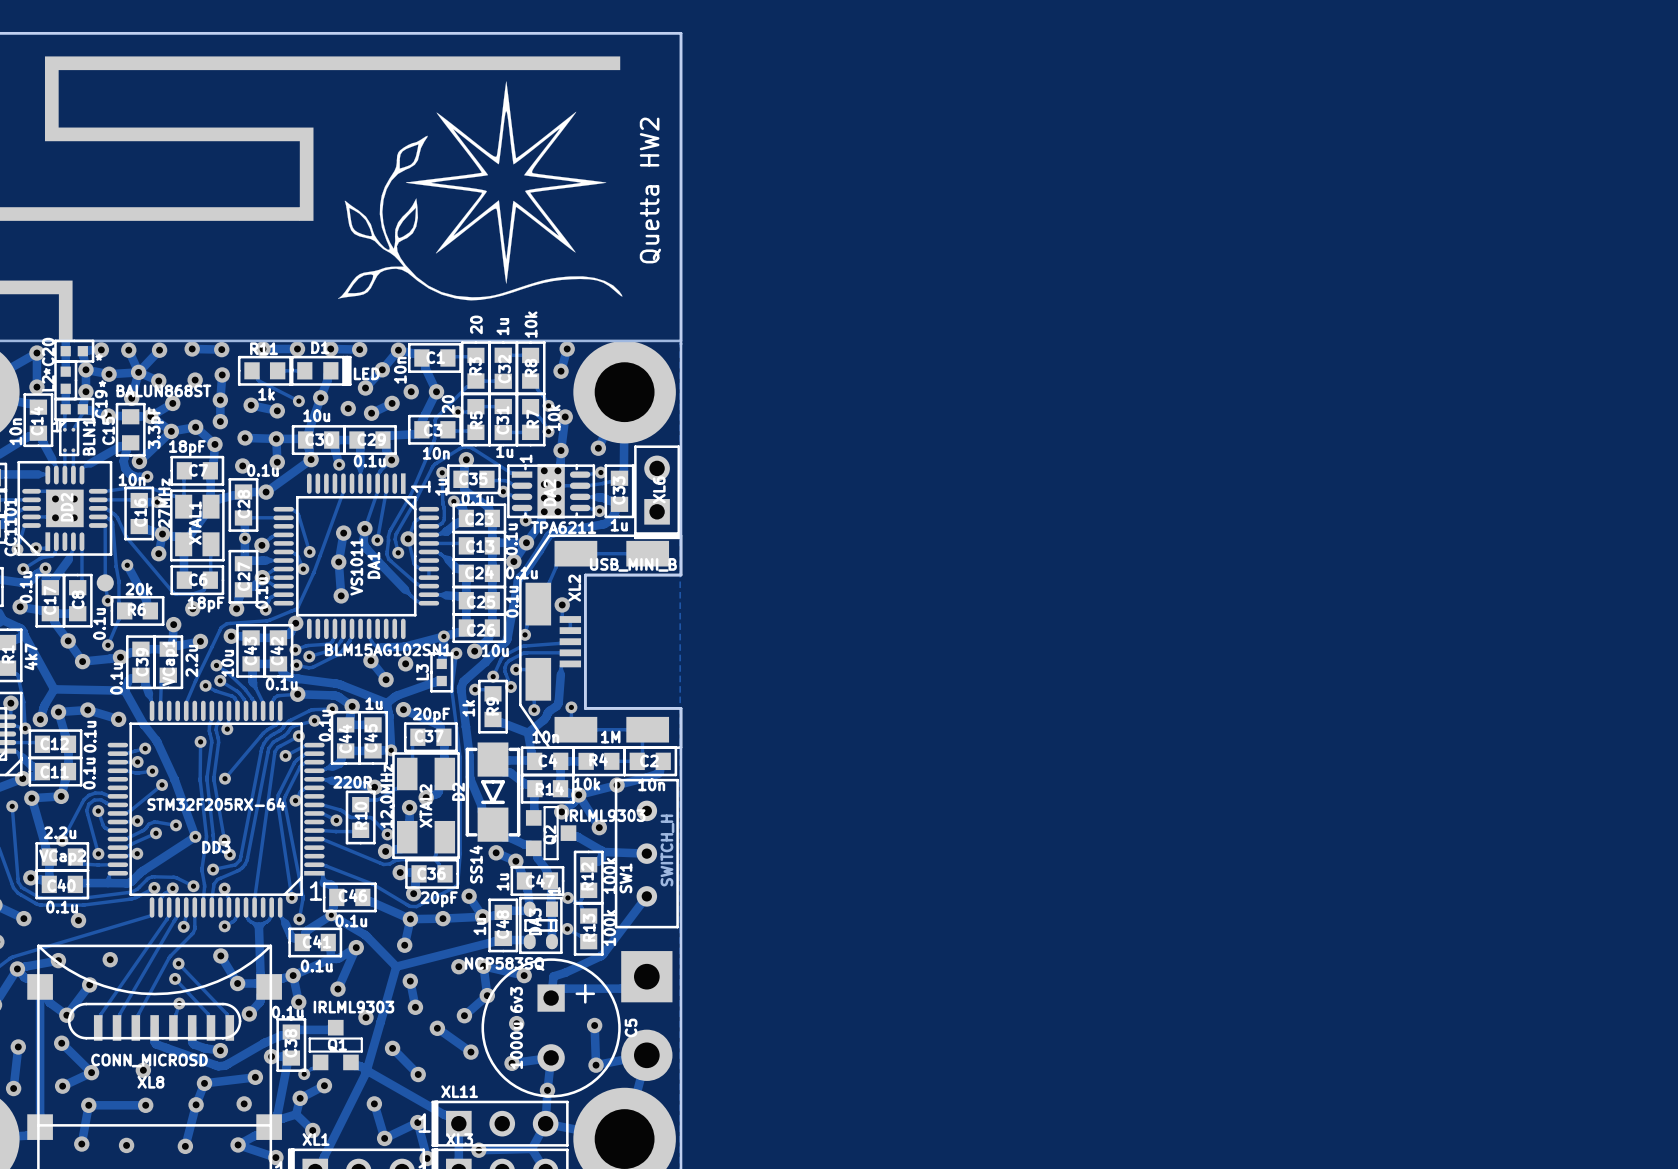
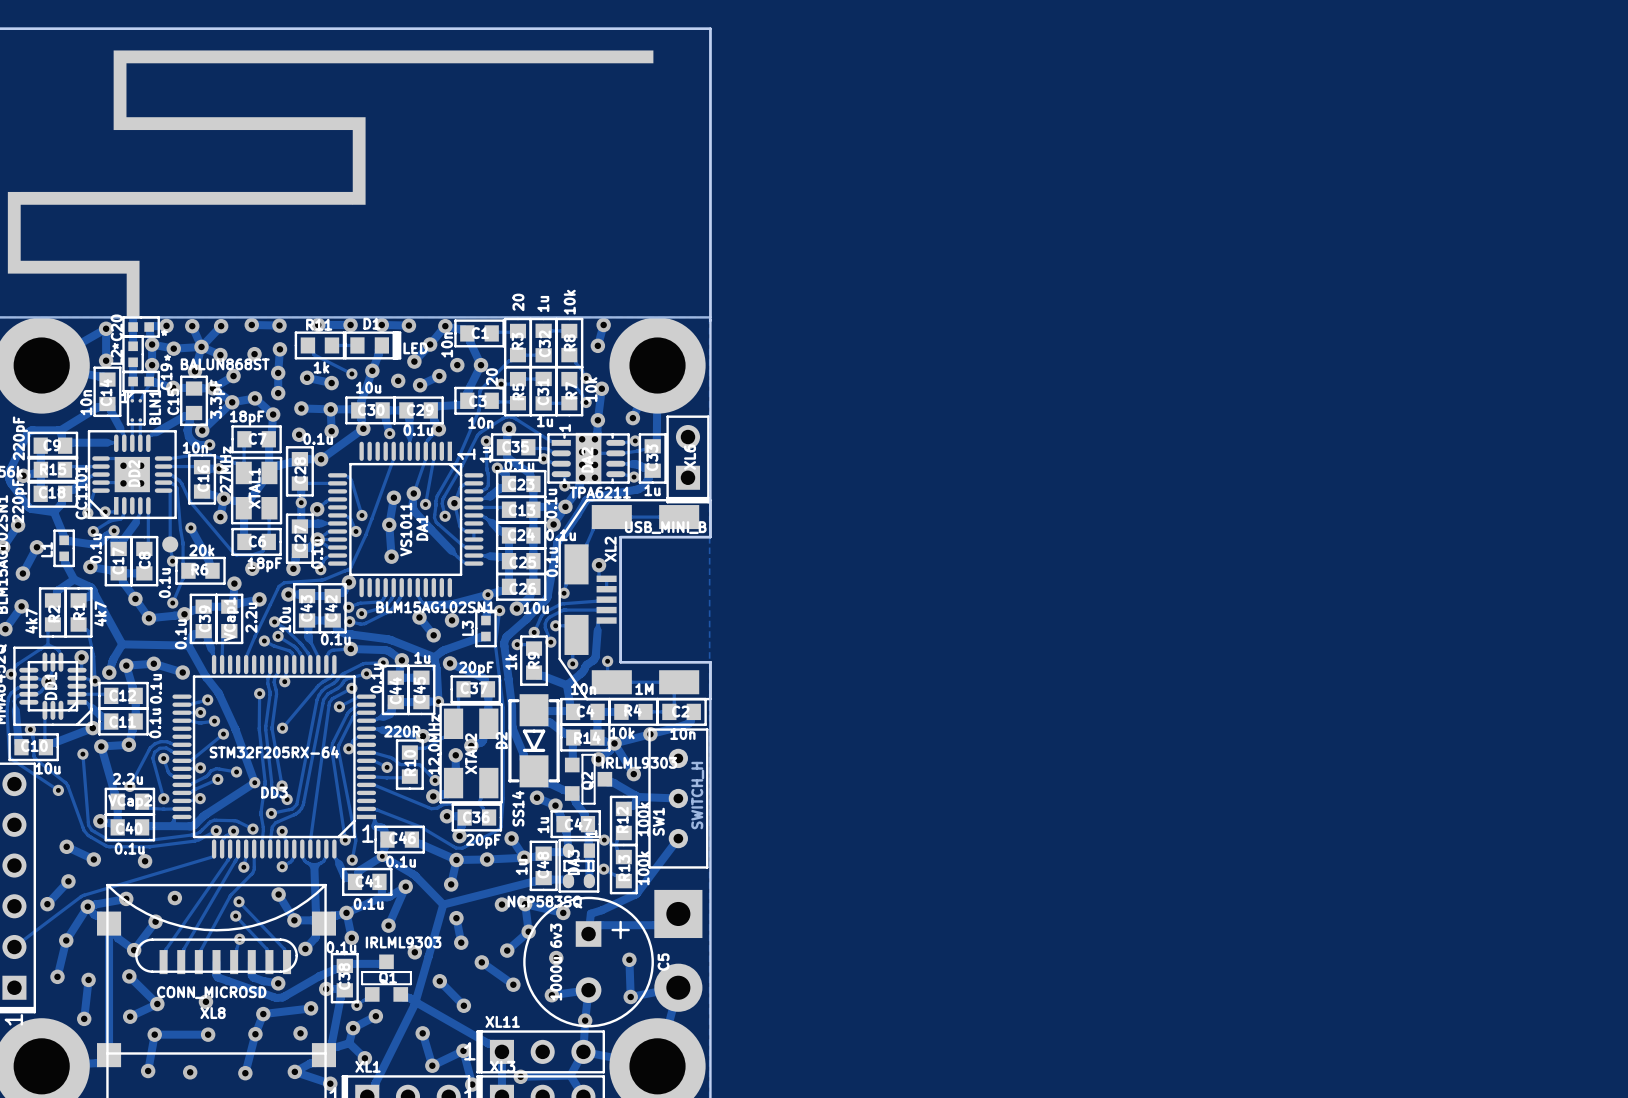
drawing: [337, 81, 623, 301] -> none
text: Quetta HW2 (650, 190) -> none

